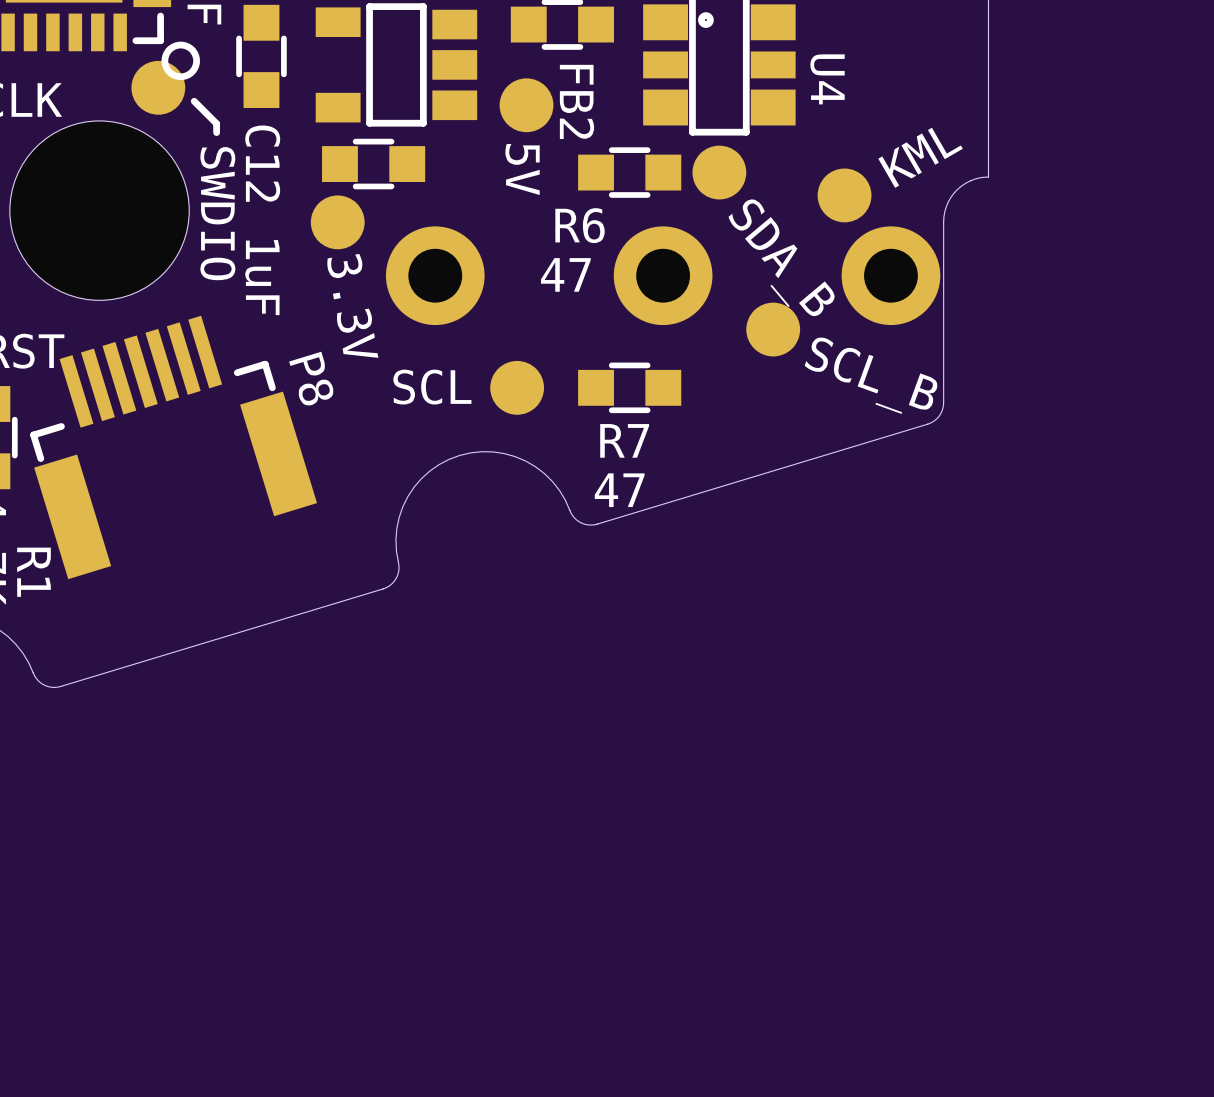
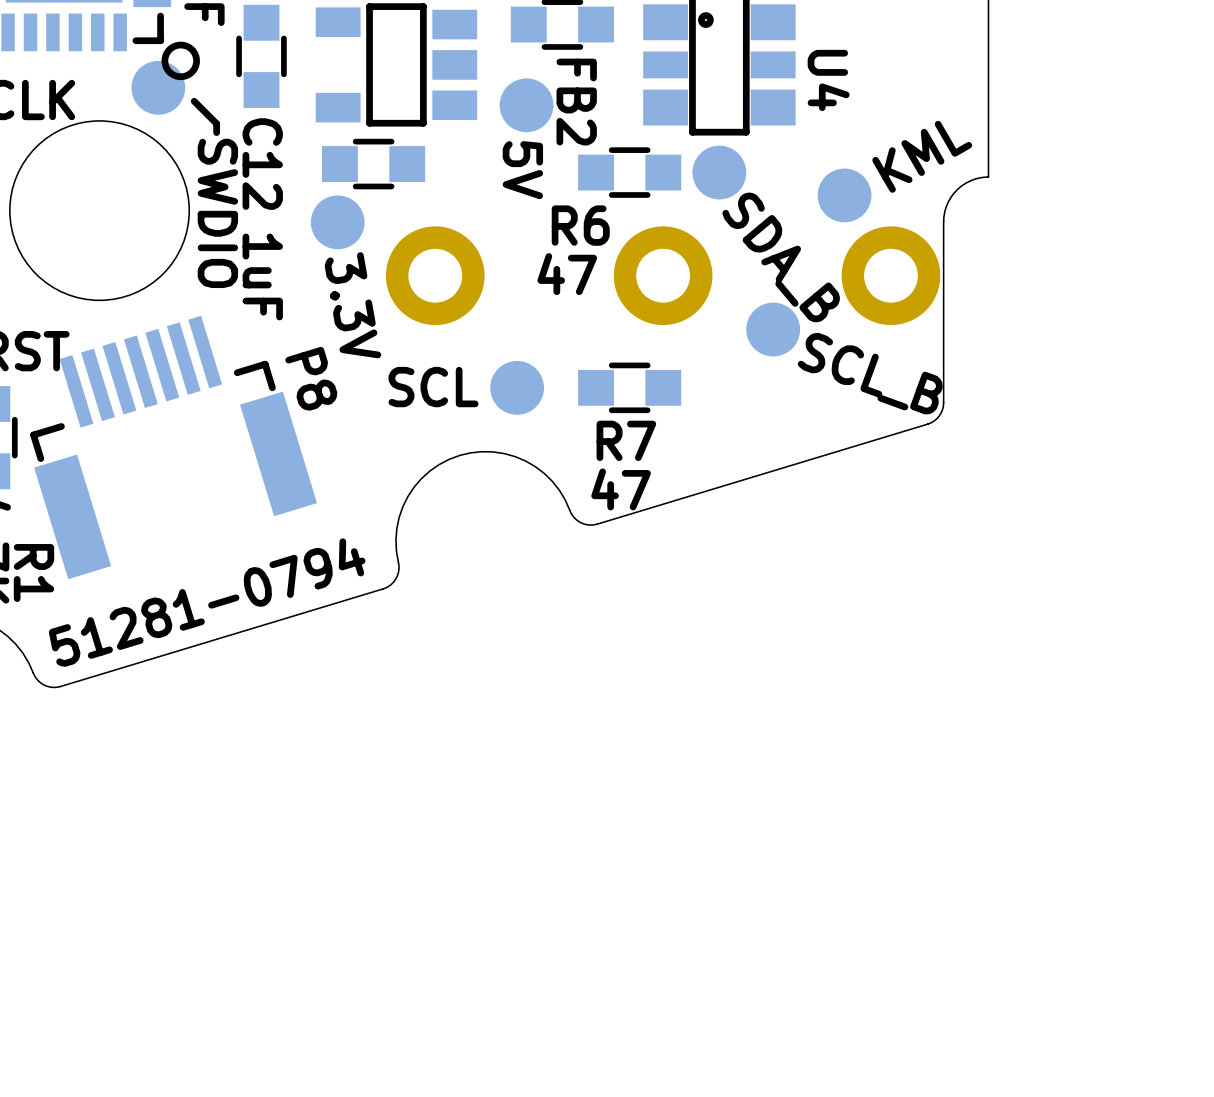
text: none -> 51281-0794 (207, 602)

